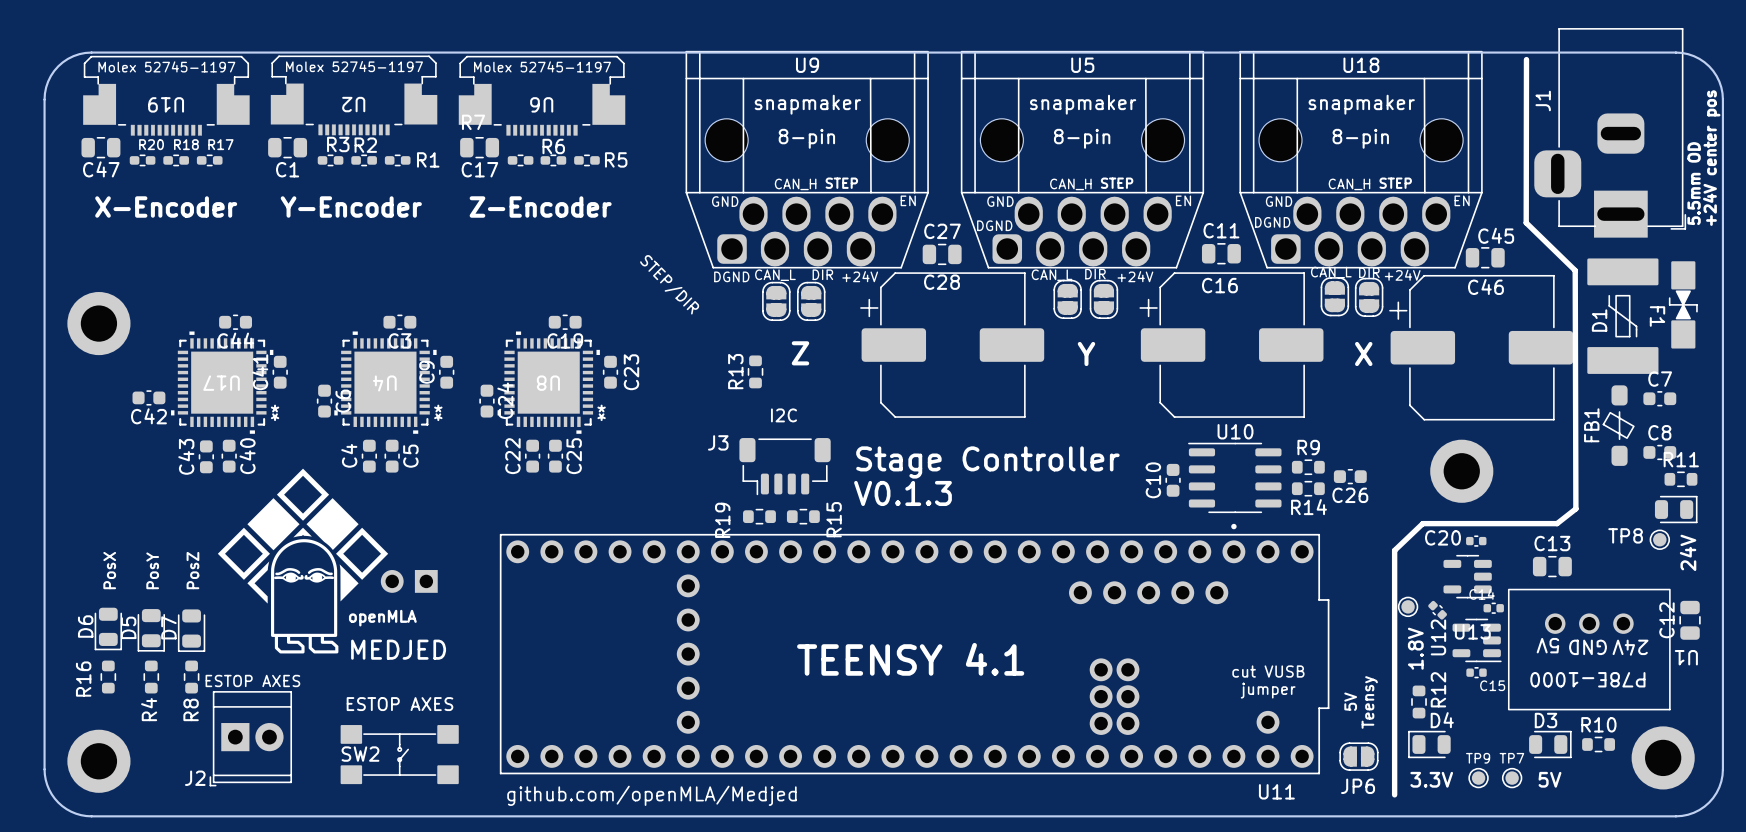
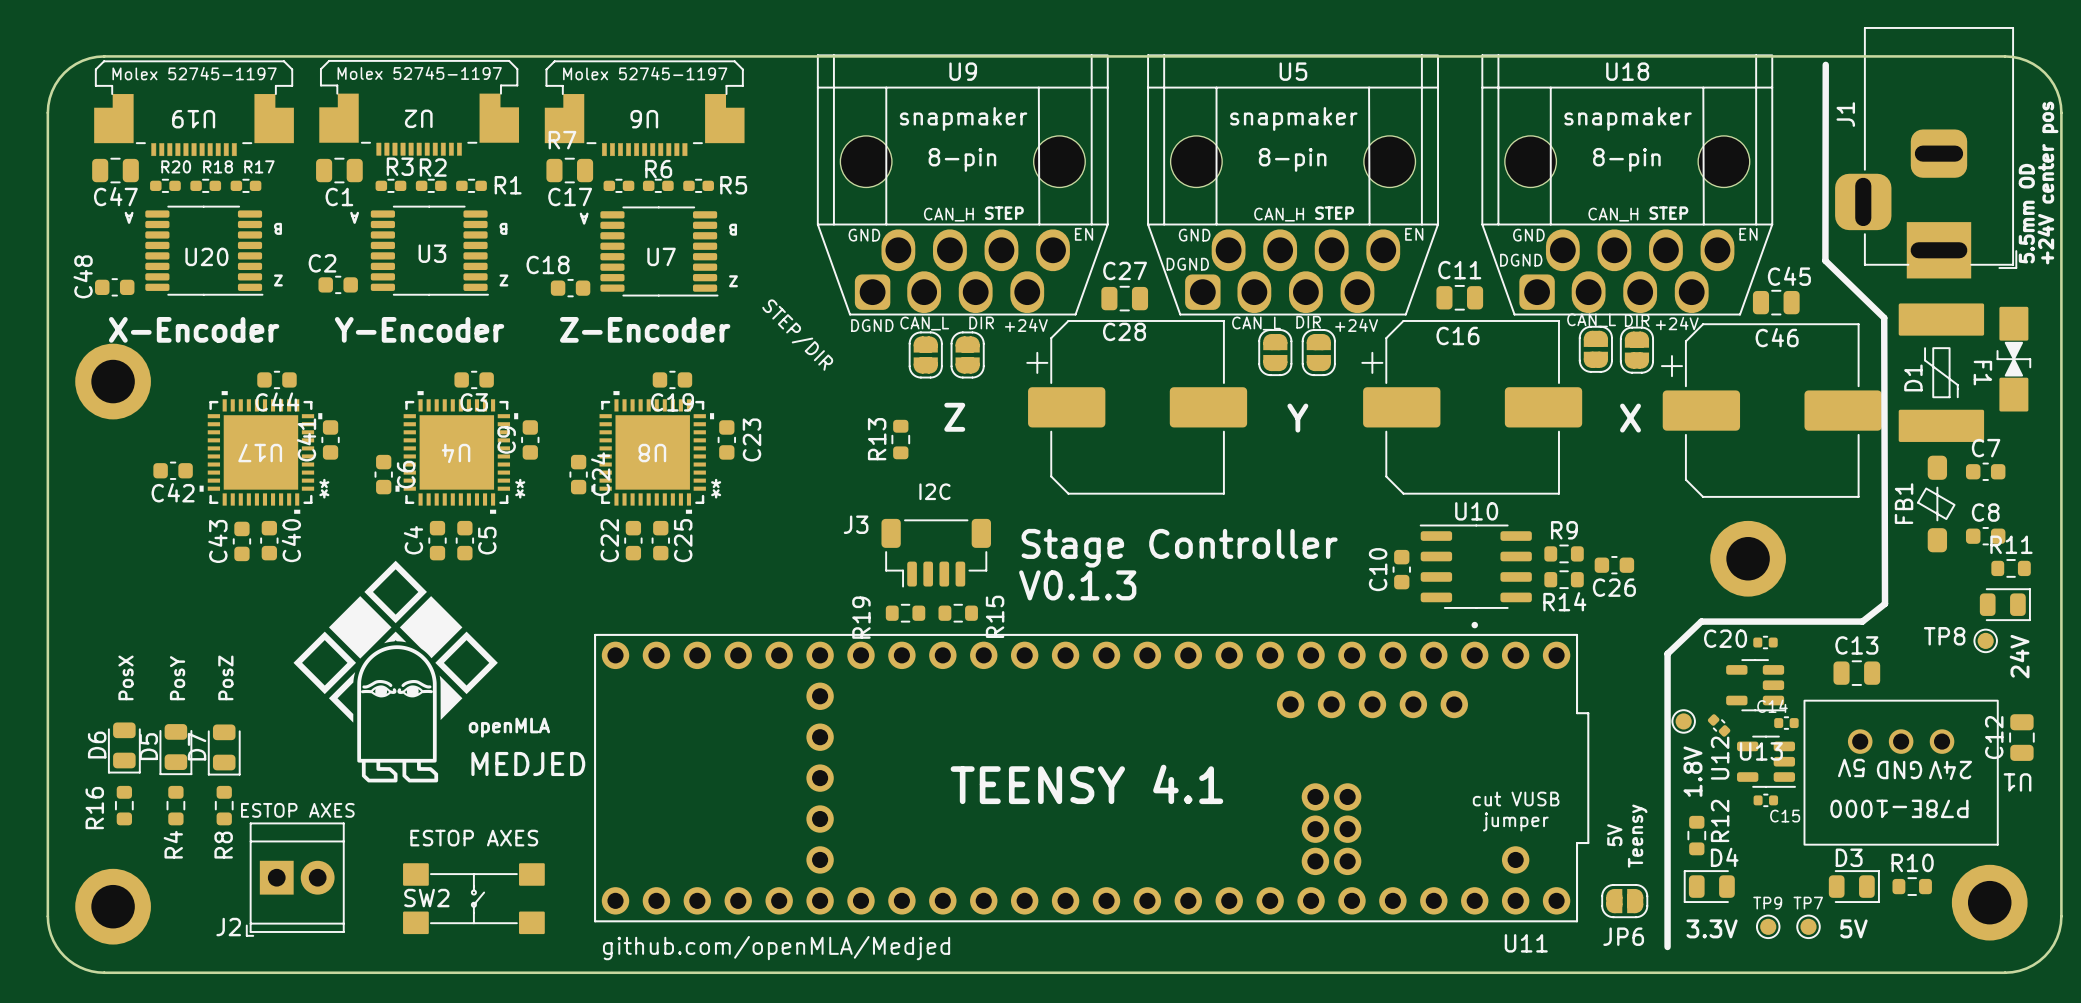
text position: X-Encoder (166, 207) -> X-Encoder (194, 329)
text position: Y-Encoder (351, 207) -> Y-Encoder (419, 329)
text position: Z-Encoder (540, 207) -> Z-Encoder (645, 329)
U20: none -> (204, 250)
U3: none -> (429, 250)
U7: none -> (659, 251)
C2: none -> (338, 284)
C48: none -> (114, 287)
C18: none -> (570, 288)
drawing position: (303, 561) -> (395, 671)
part: (409, 581) -> none
text position: openMLA (382, 618) -> openMLA (509, 727)
text position: MEDJED (398, 649) -> MEDJED (528, 763)

